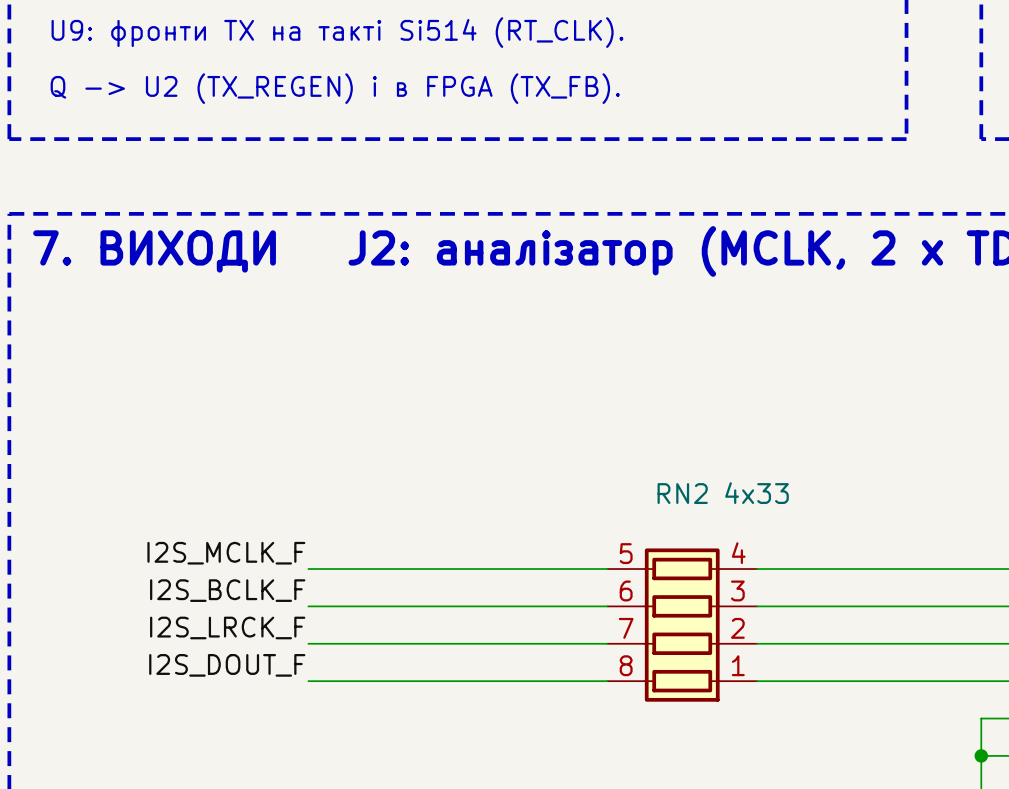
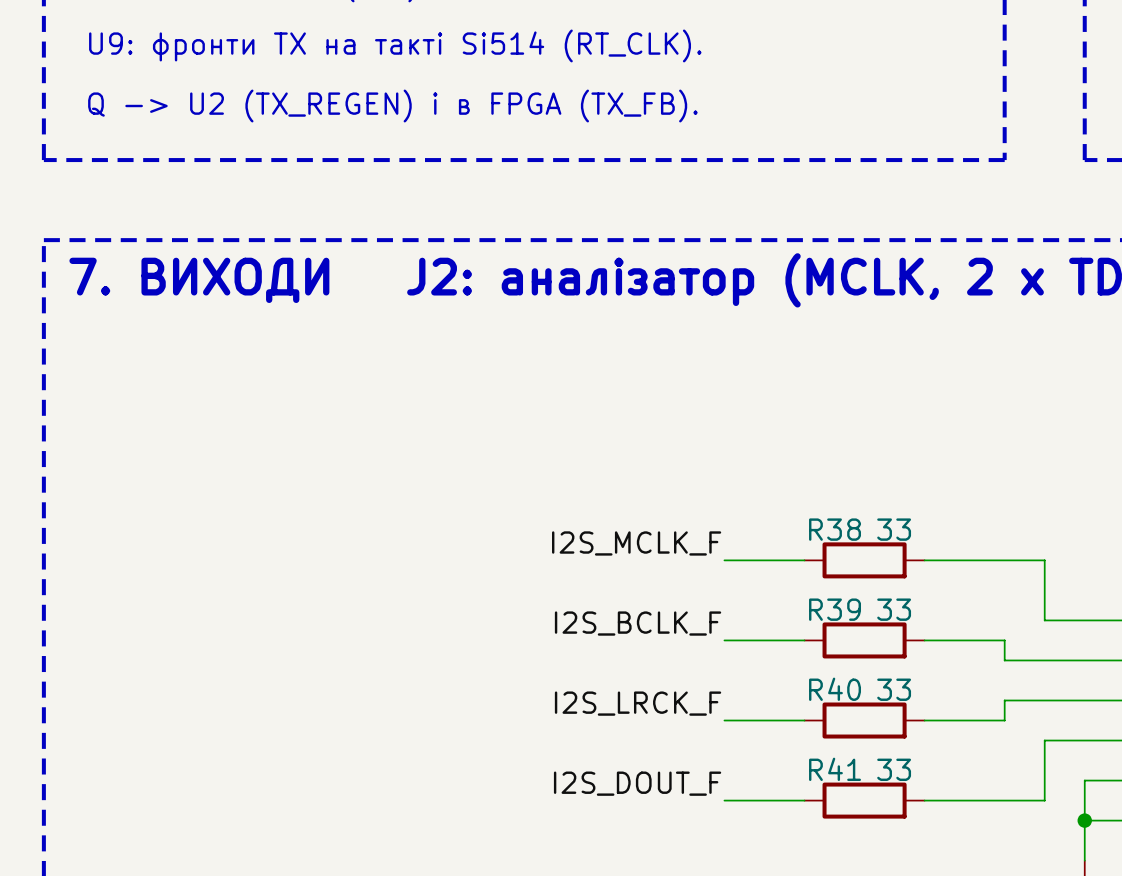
wire: none -> (724, 560) (804, 560)
R38: none -> 33 (864, 560)
label position: I2S_MCLK_F (226, 553) -> I2S_MCLK_F (636, 543)
wire: (308, 569) (607, 569) -> none
wire: (757, 569) (943, 569) -> (924, 560) (1044, 560) (1044, 620)
R39: none -> 33 (864, 640)
label position: I2S_BCLK_F (227, 590) -> I2S_BCLK_F (638, 623)
wire: (308, 606) (607, 606) -> none
wire: (757, 606) (906, 606) -> (924, 640) (1004, 640) (1004, 660)
RN2: 4x33 (682, 625) -> none
label position: I2S_LRCK_F (227, 627) -> I2S_LRCK_F (638, 703)
wire: (308, 643) (607, 643) -> none
wire: (757, 643) (906, 643) -> (924, 720) (1004, 720) (1004, 700)
R40: none -> 33 (864, 720)
label position: I2S_DOUT_F (227, 665) -> I2S_DOUT_F (637, 783)
wire: (308, 681) (607, 681) -> none
wire: (757, 681) (943, 681) -> (924, 800) (1044, 800) (1044, 740)
wire: none -> (724, 800) (804, 800)
R41: none -> 33 (864, 800)

